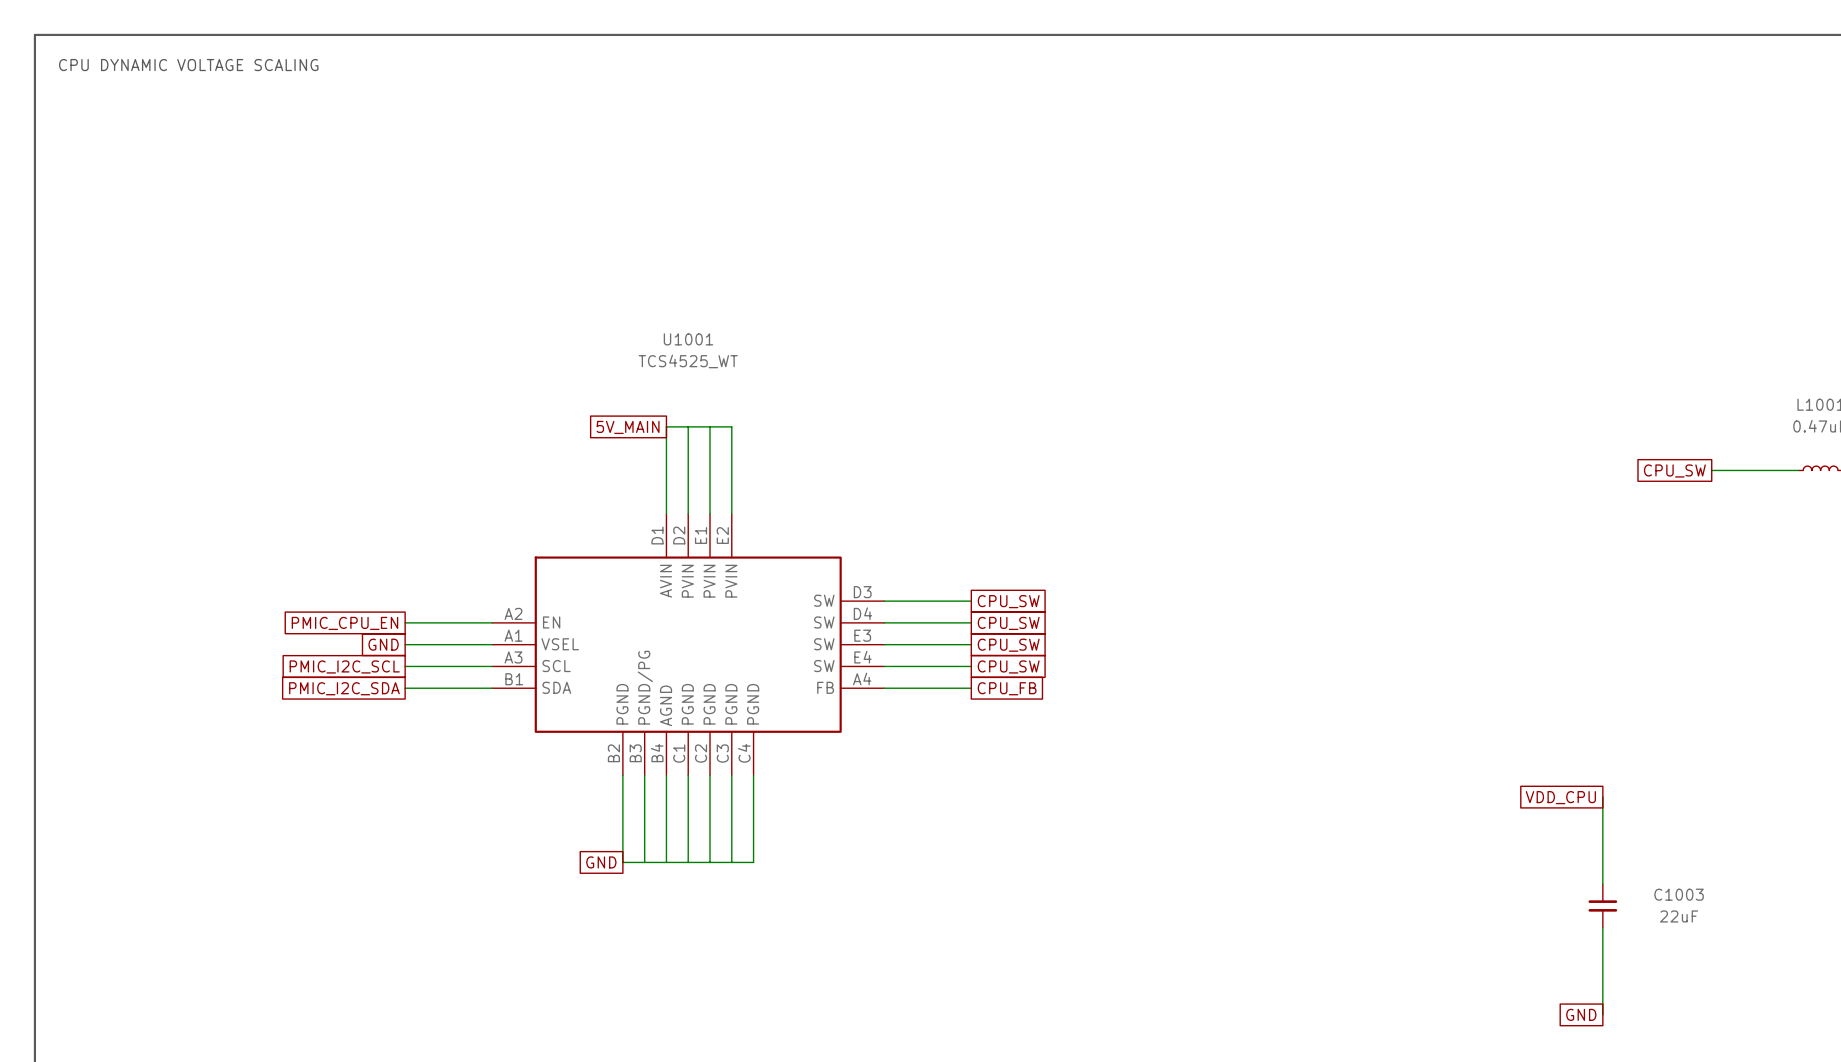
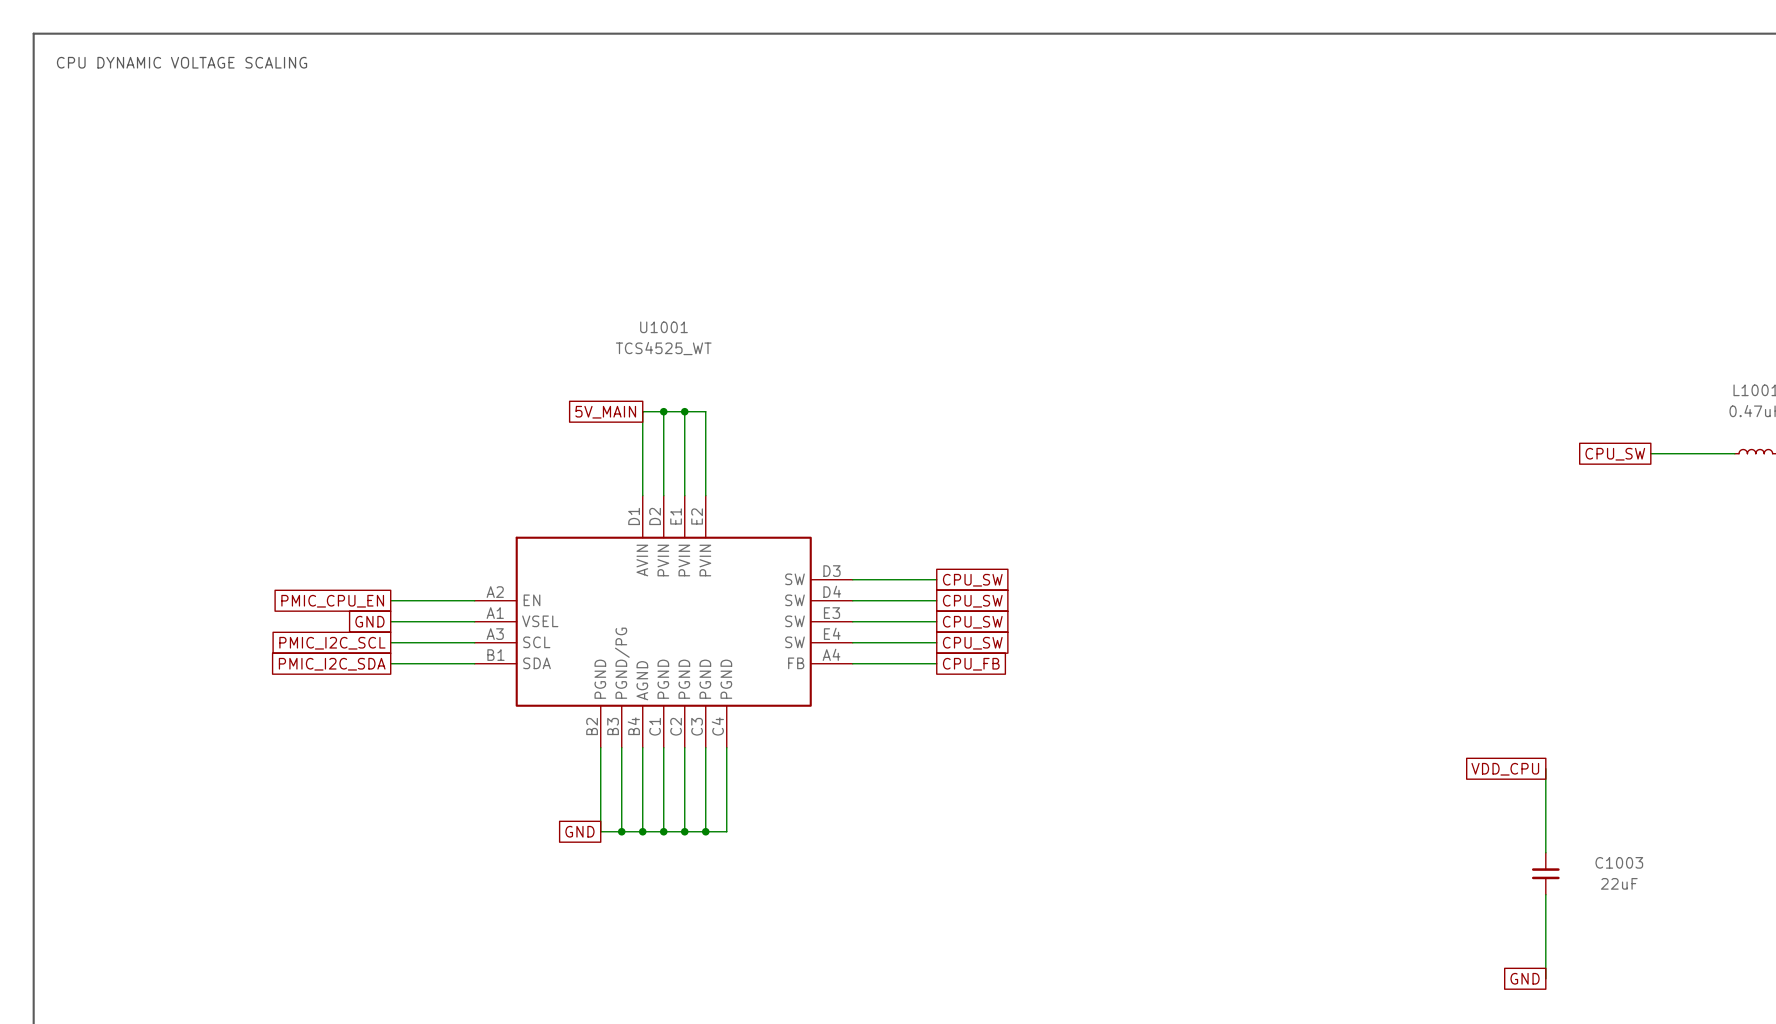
junction: none -> (663, 411)
junction: none -> (684, 411)
junction: none -> (621, 831)
junction: none -> (642, 831)
junction: none -> (663, 831)
junction: none -> (684, 831)
junction: none -> (705, 831)

